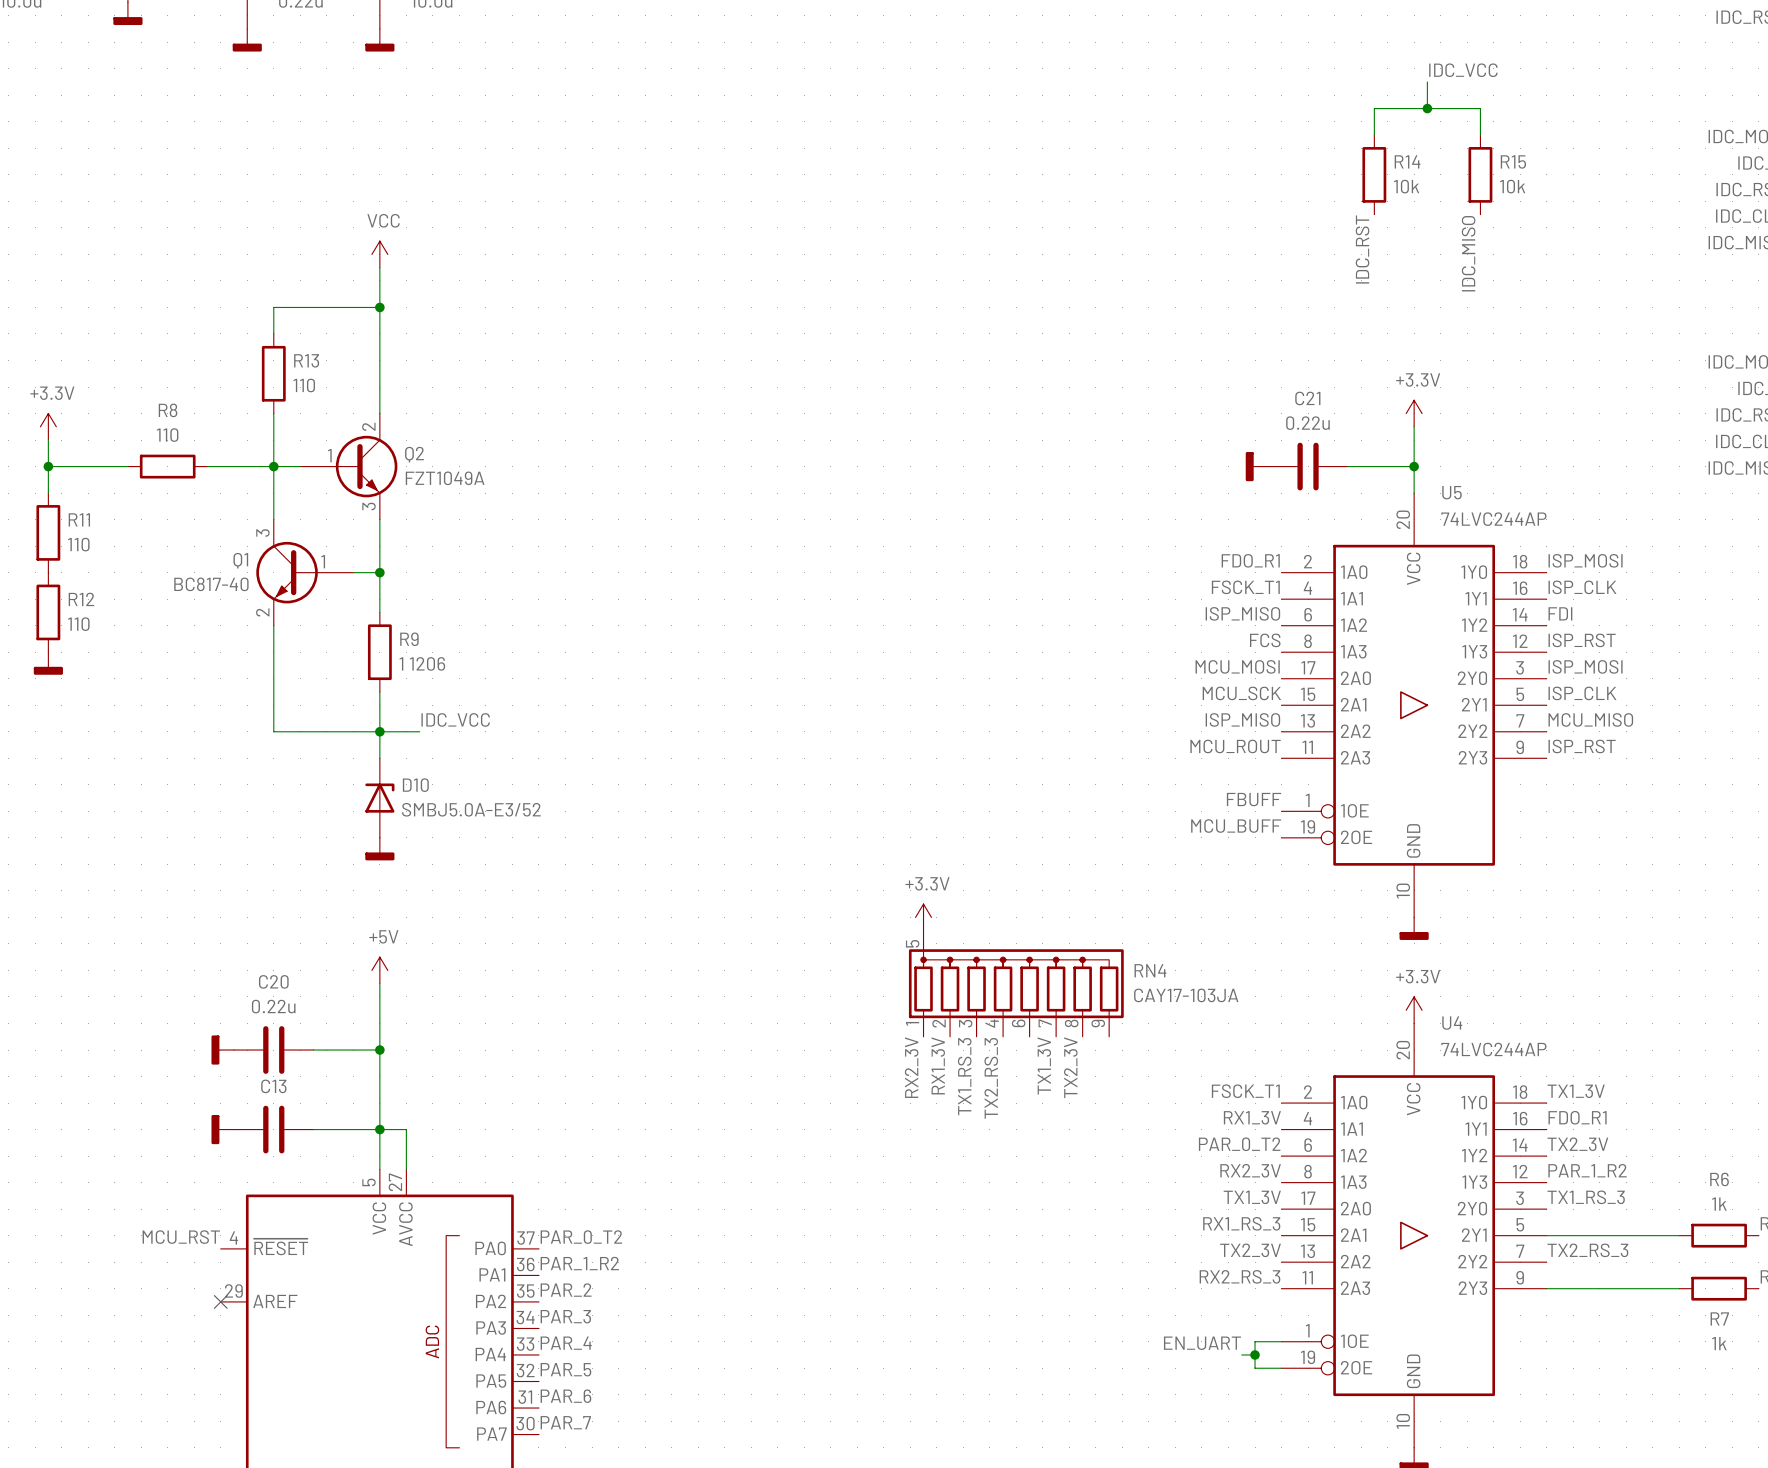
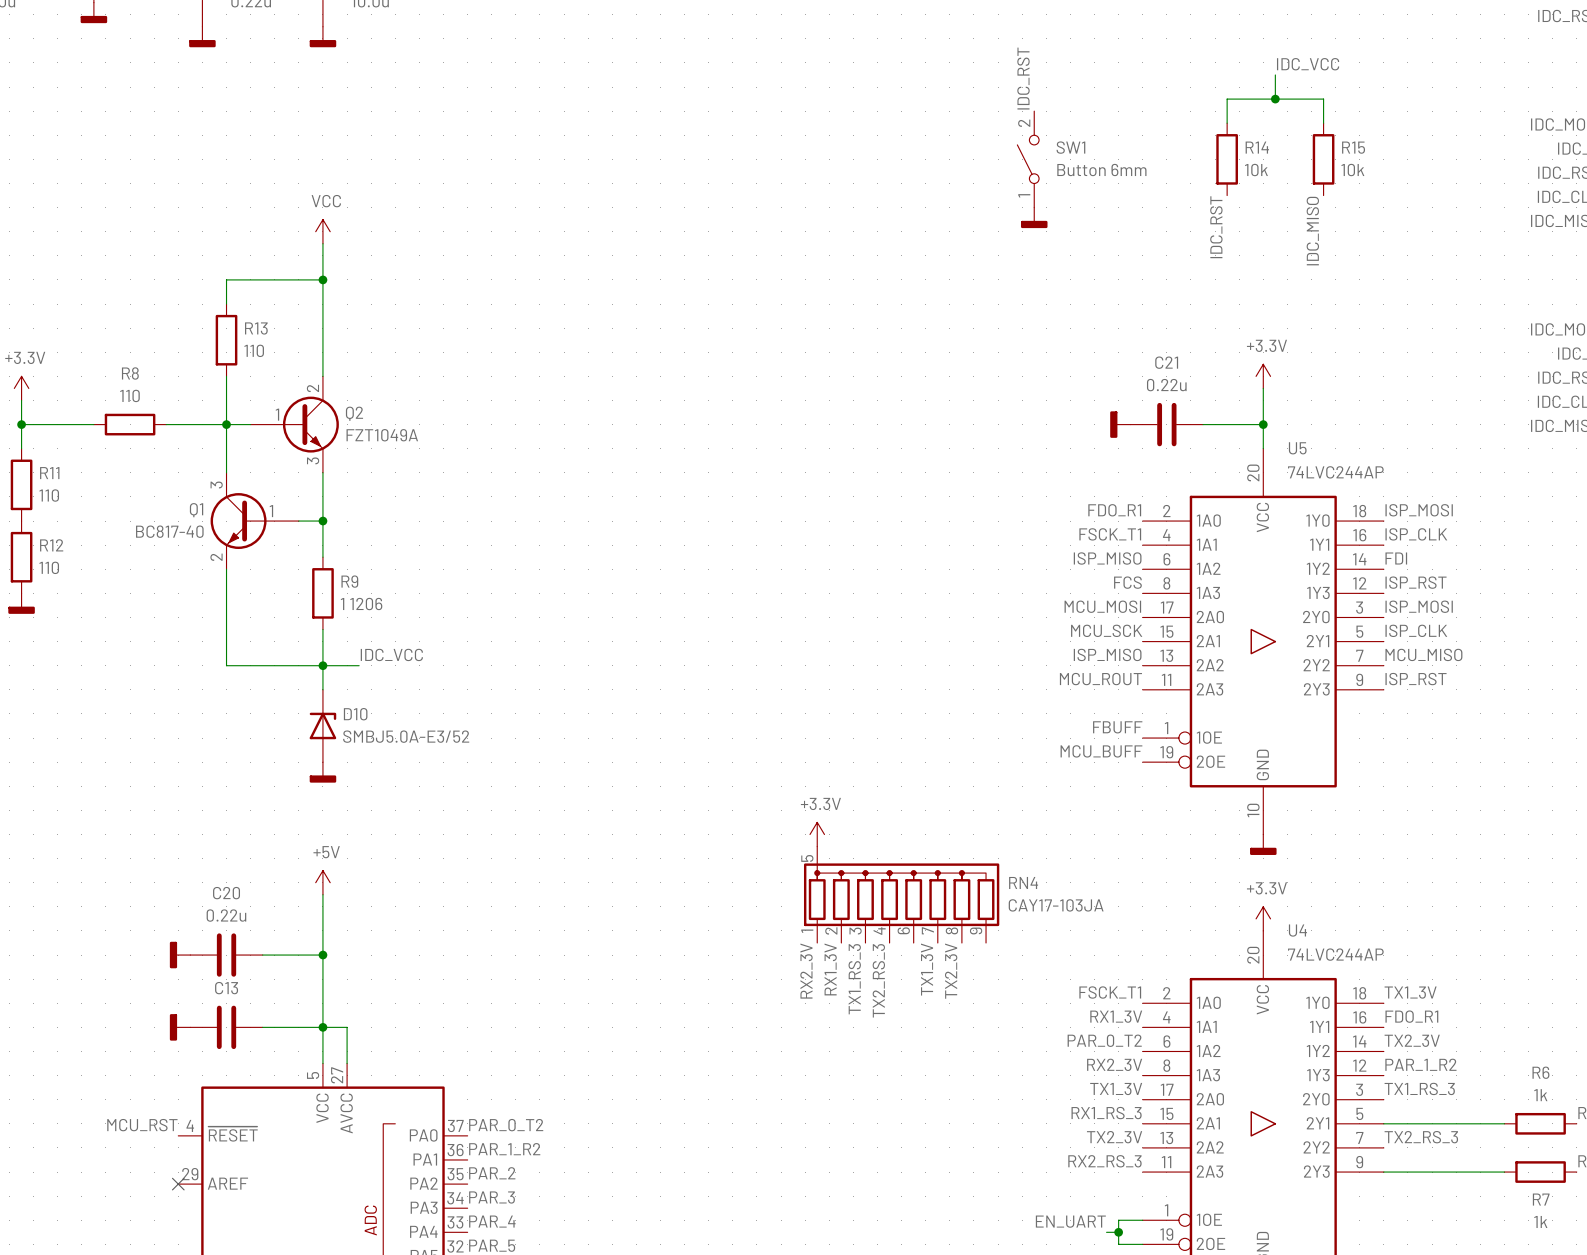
label: none -> IDC_RST (1023, 78)
SW1: none -> Button 6mm (1028, 159)
power symbol: none -> (1034, 217)

